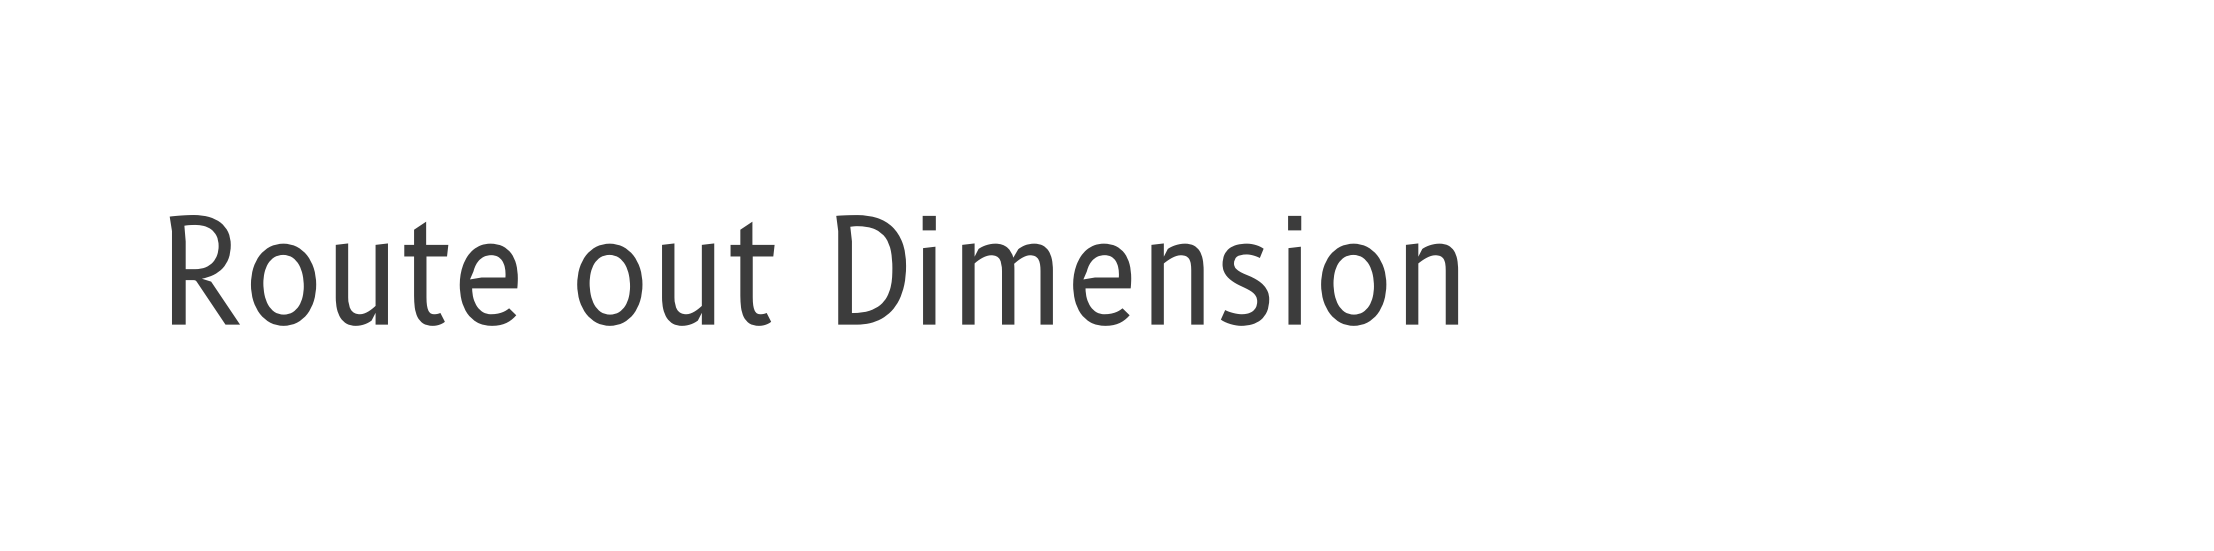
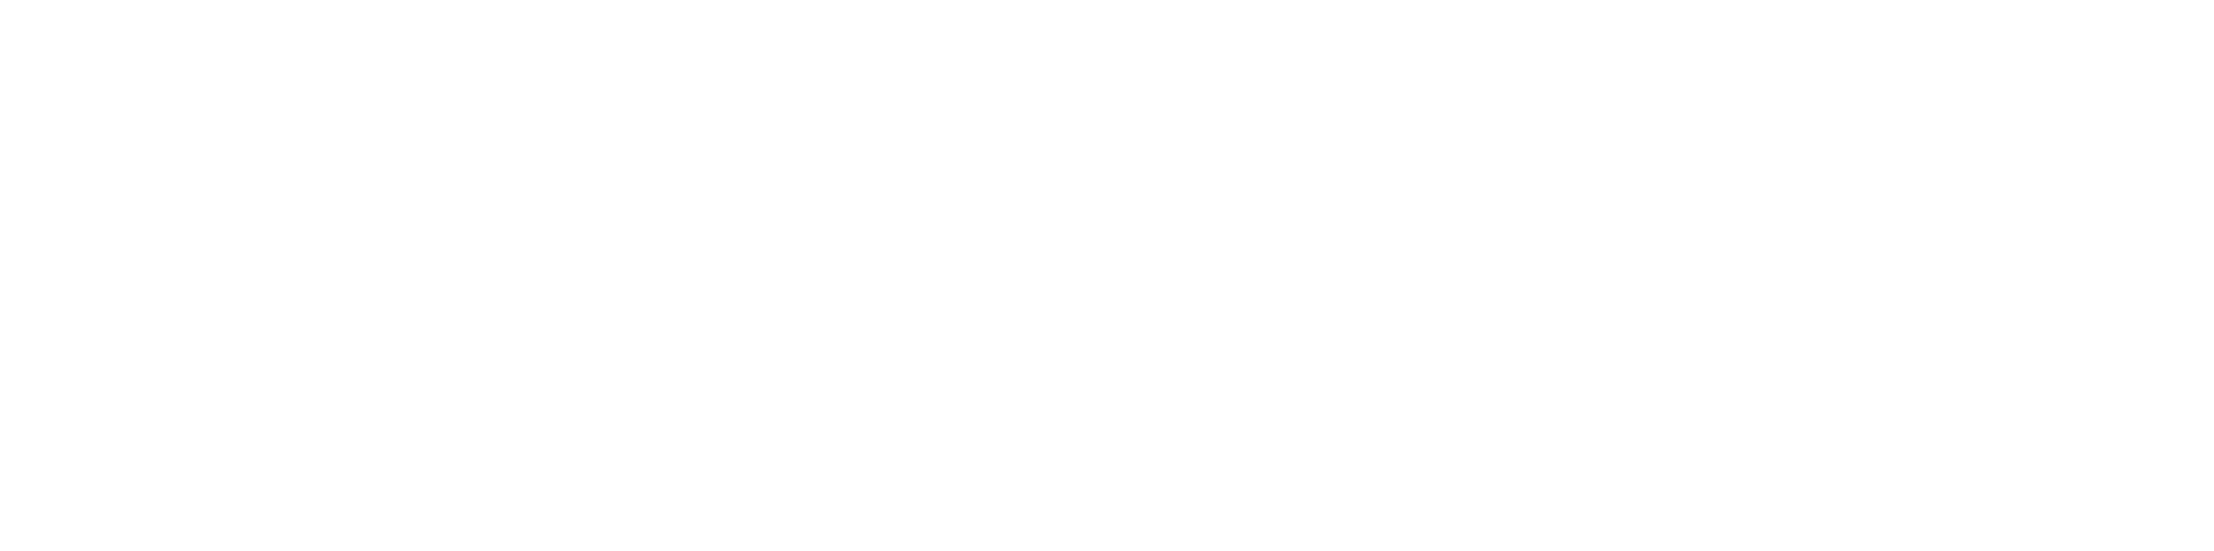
text: Route out Dimension (813, 270) -> none

